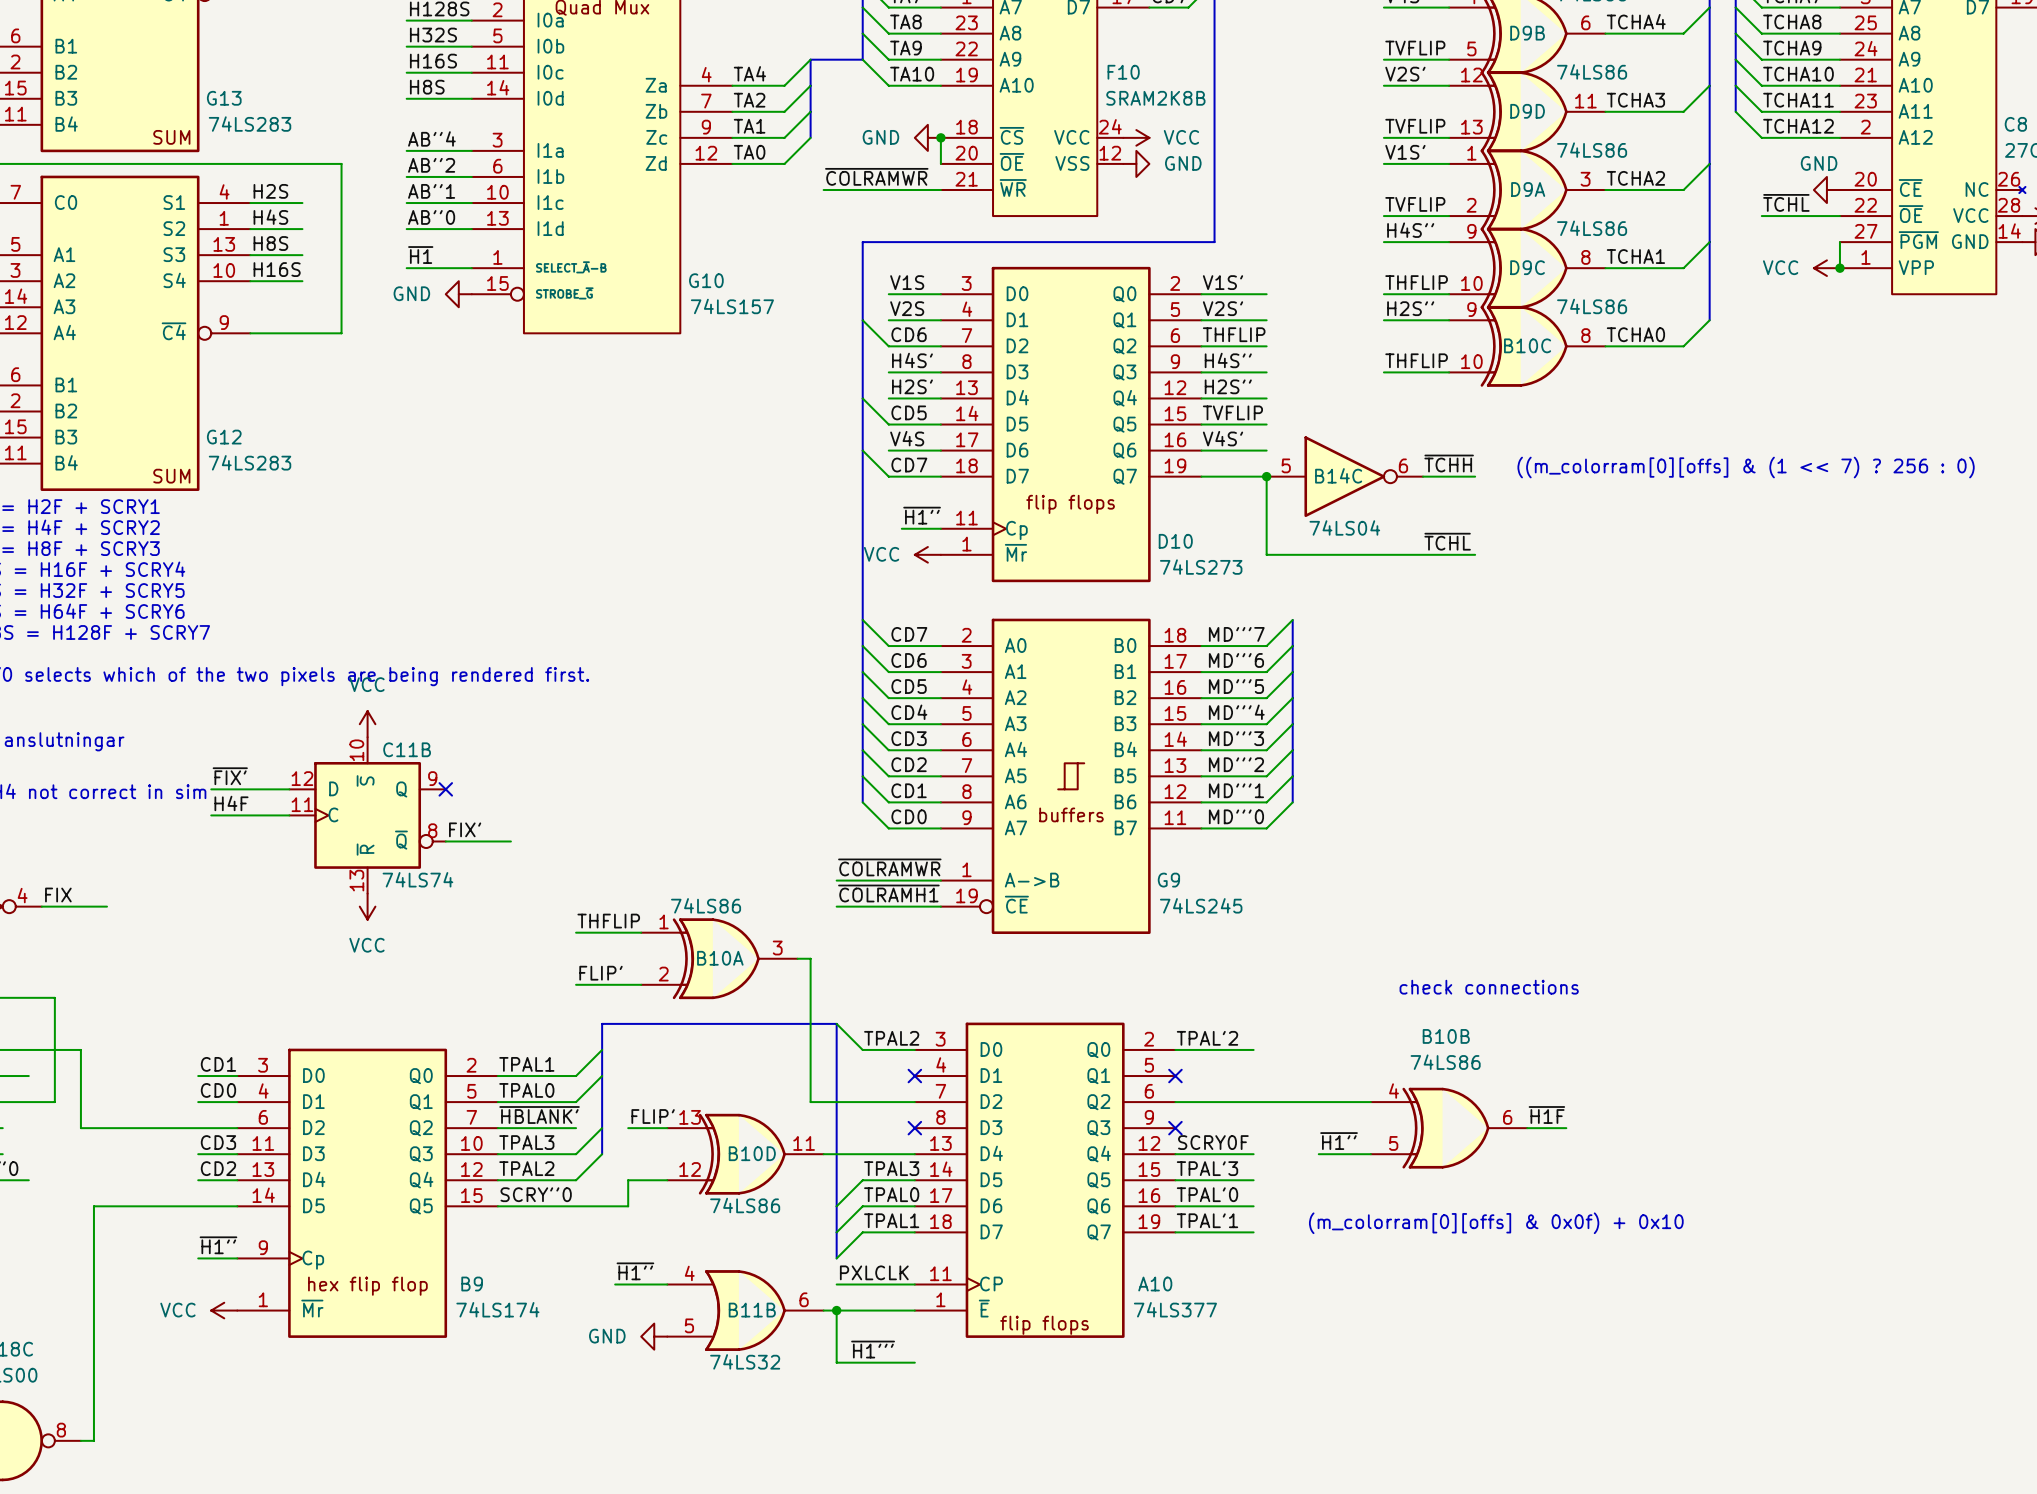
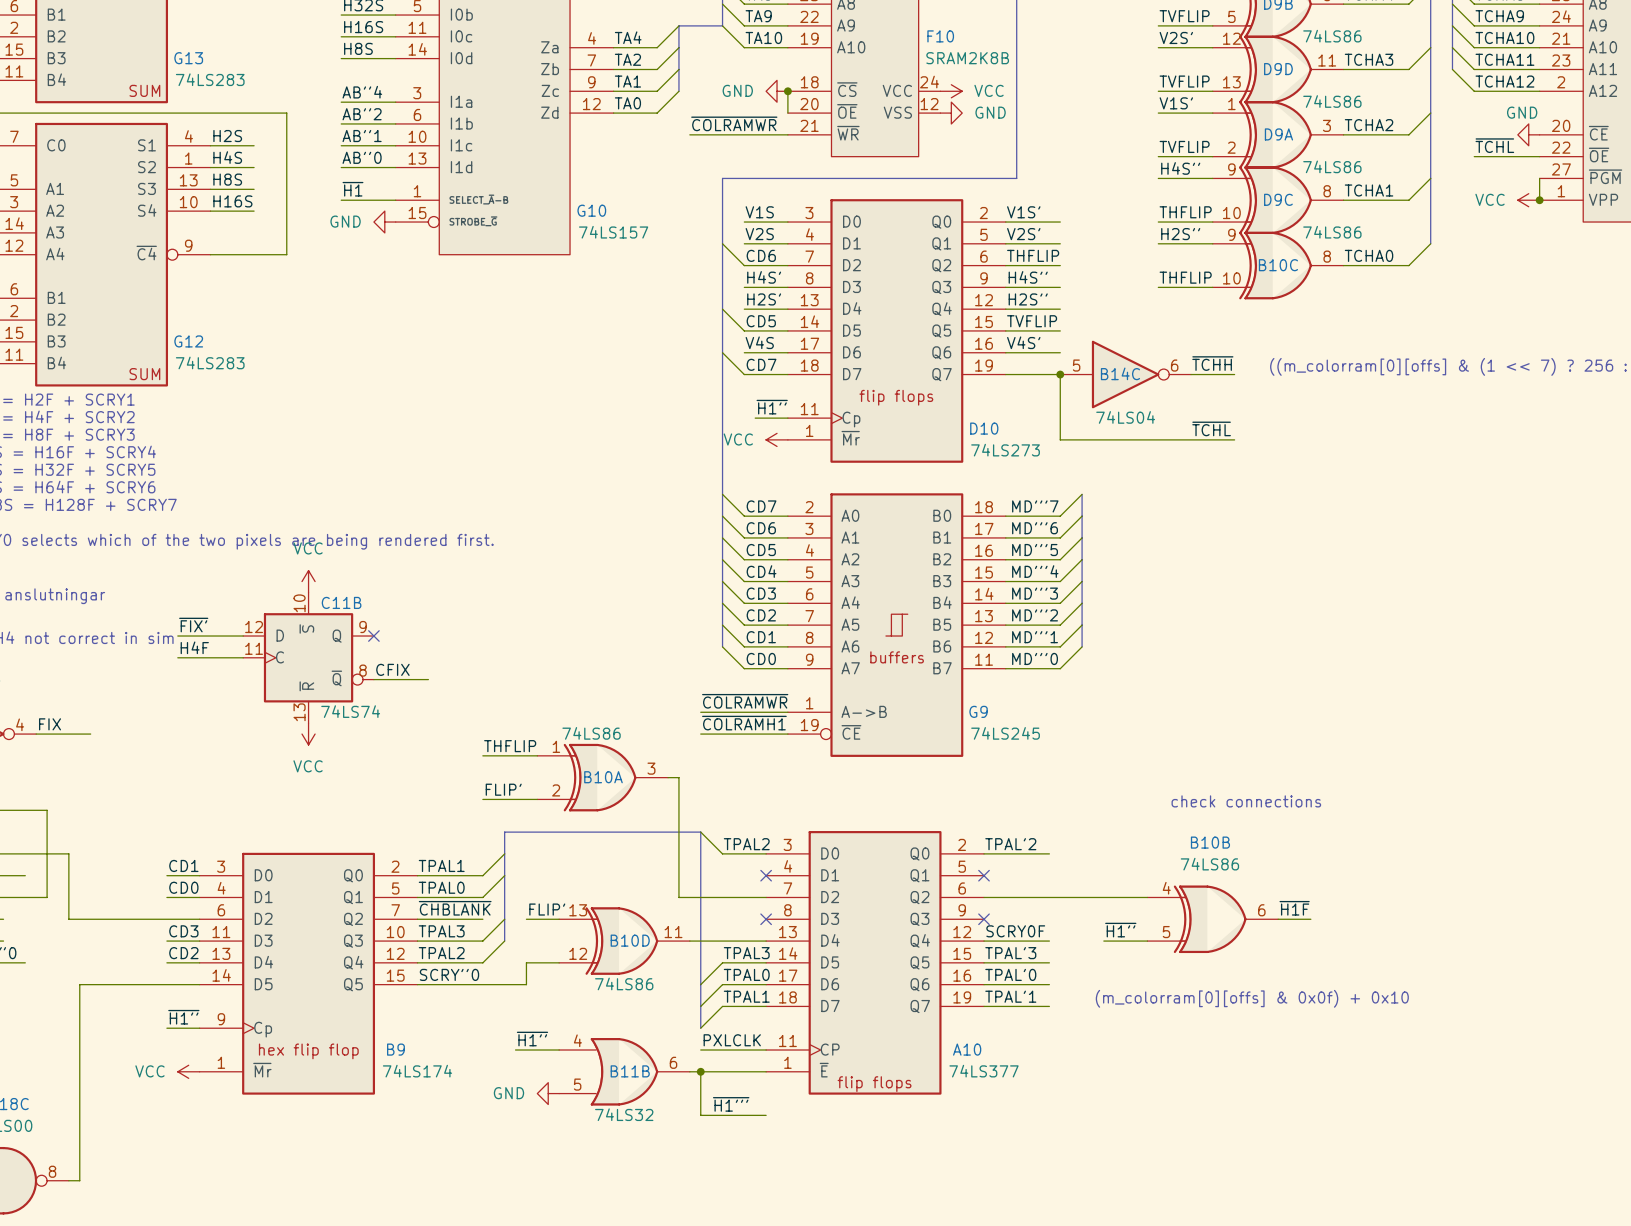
label: FIX' (465, 829) -> CFIX (392, 669)
label: ~{HBLANK'} (539, 1115) -> ~{CHBLANK} (455, 908)

